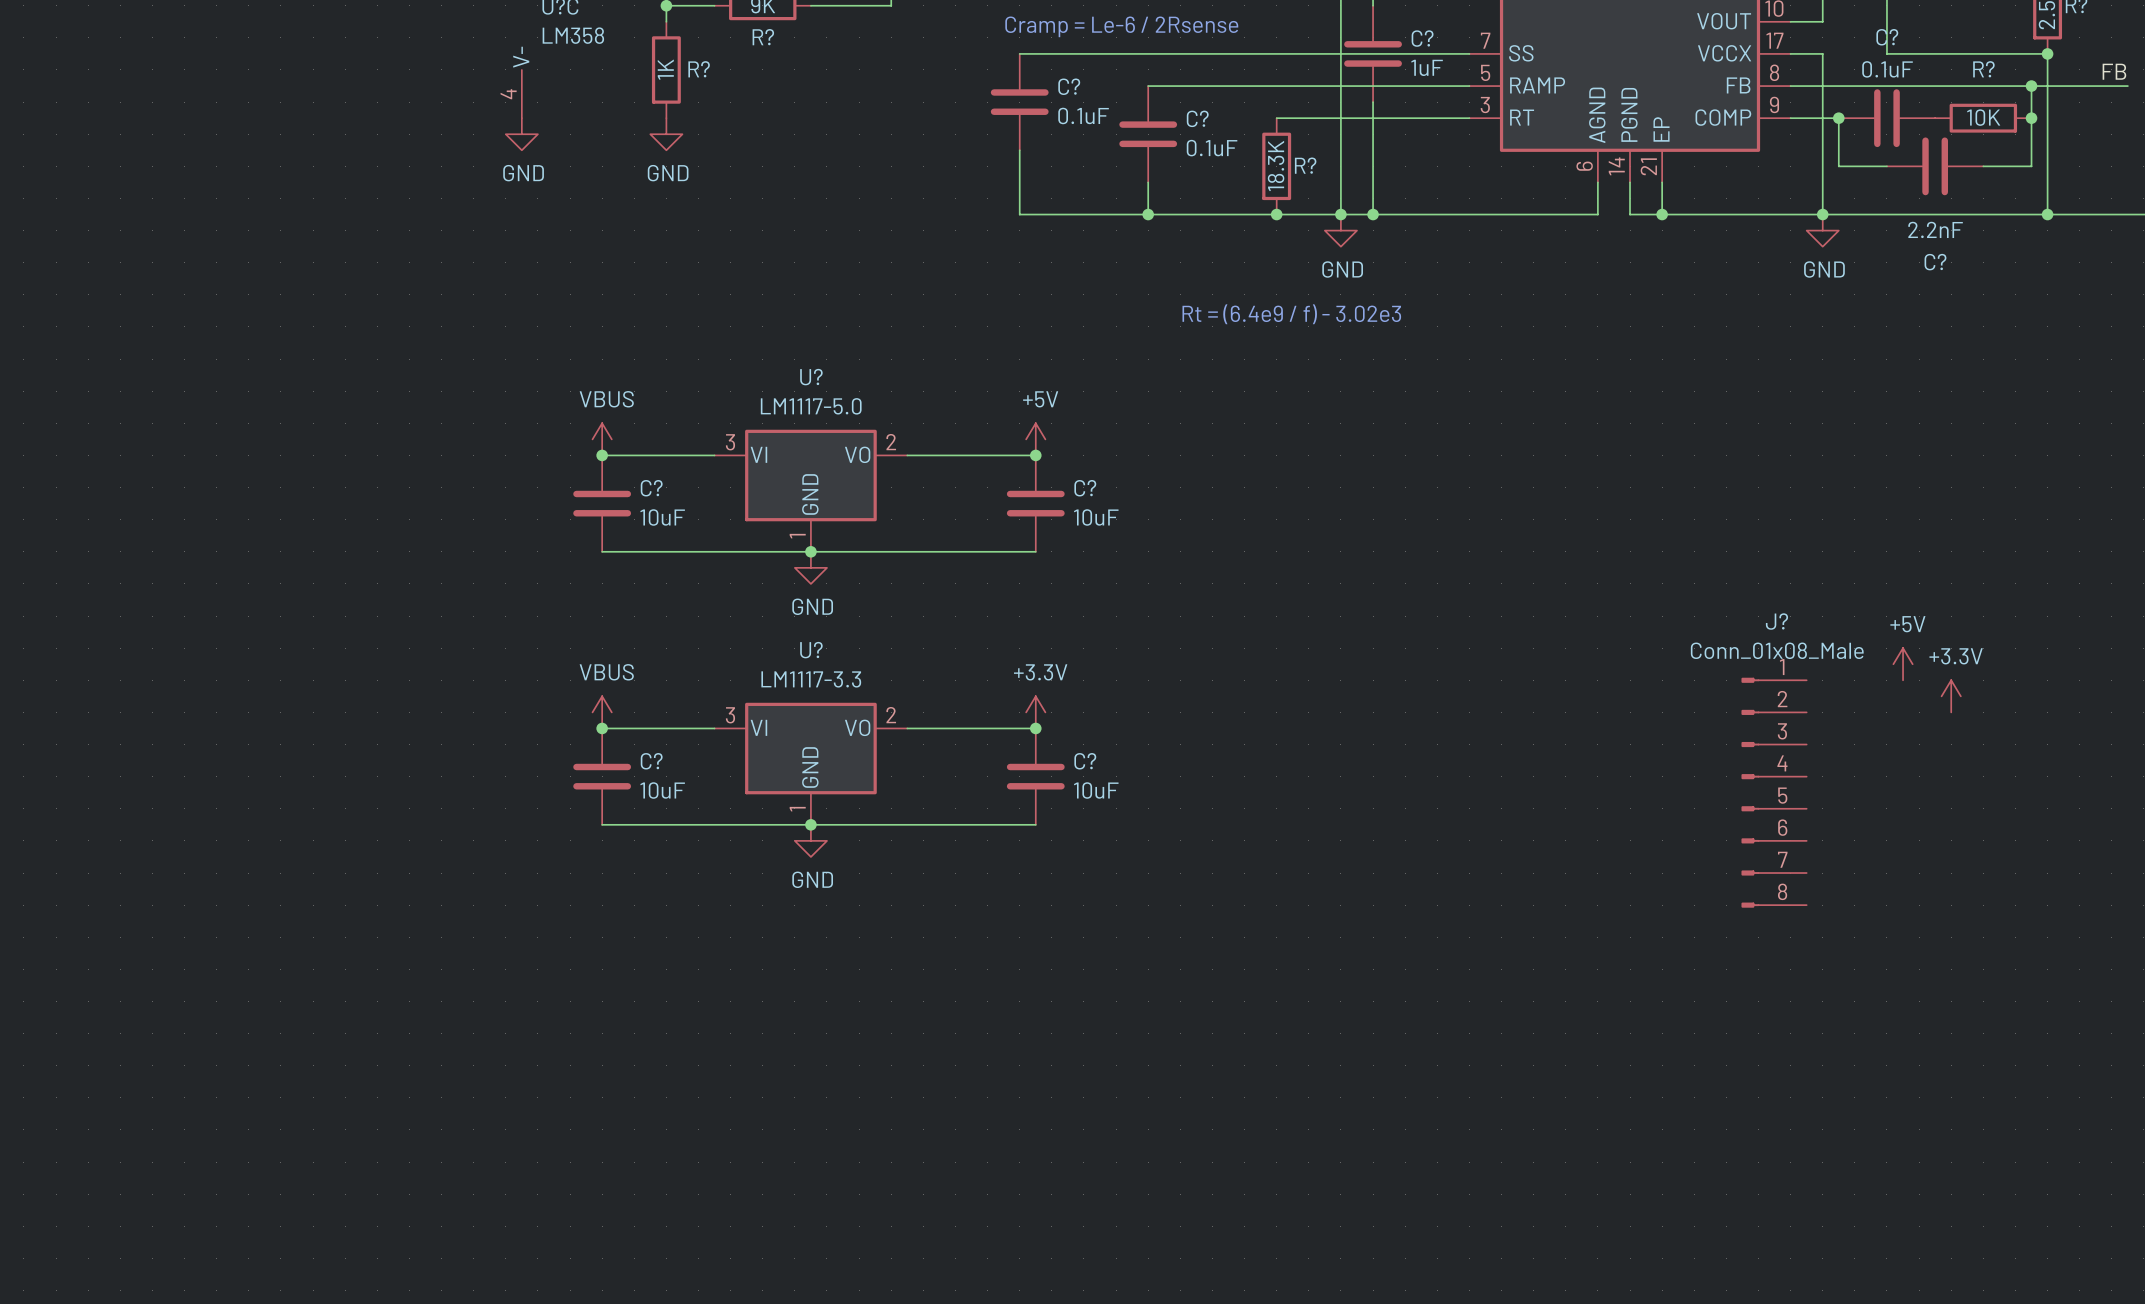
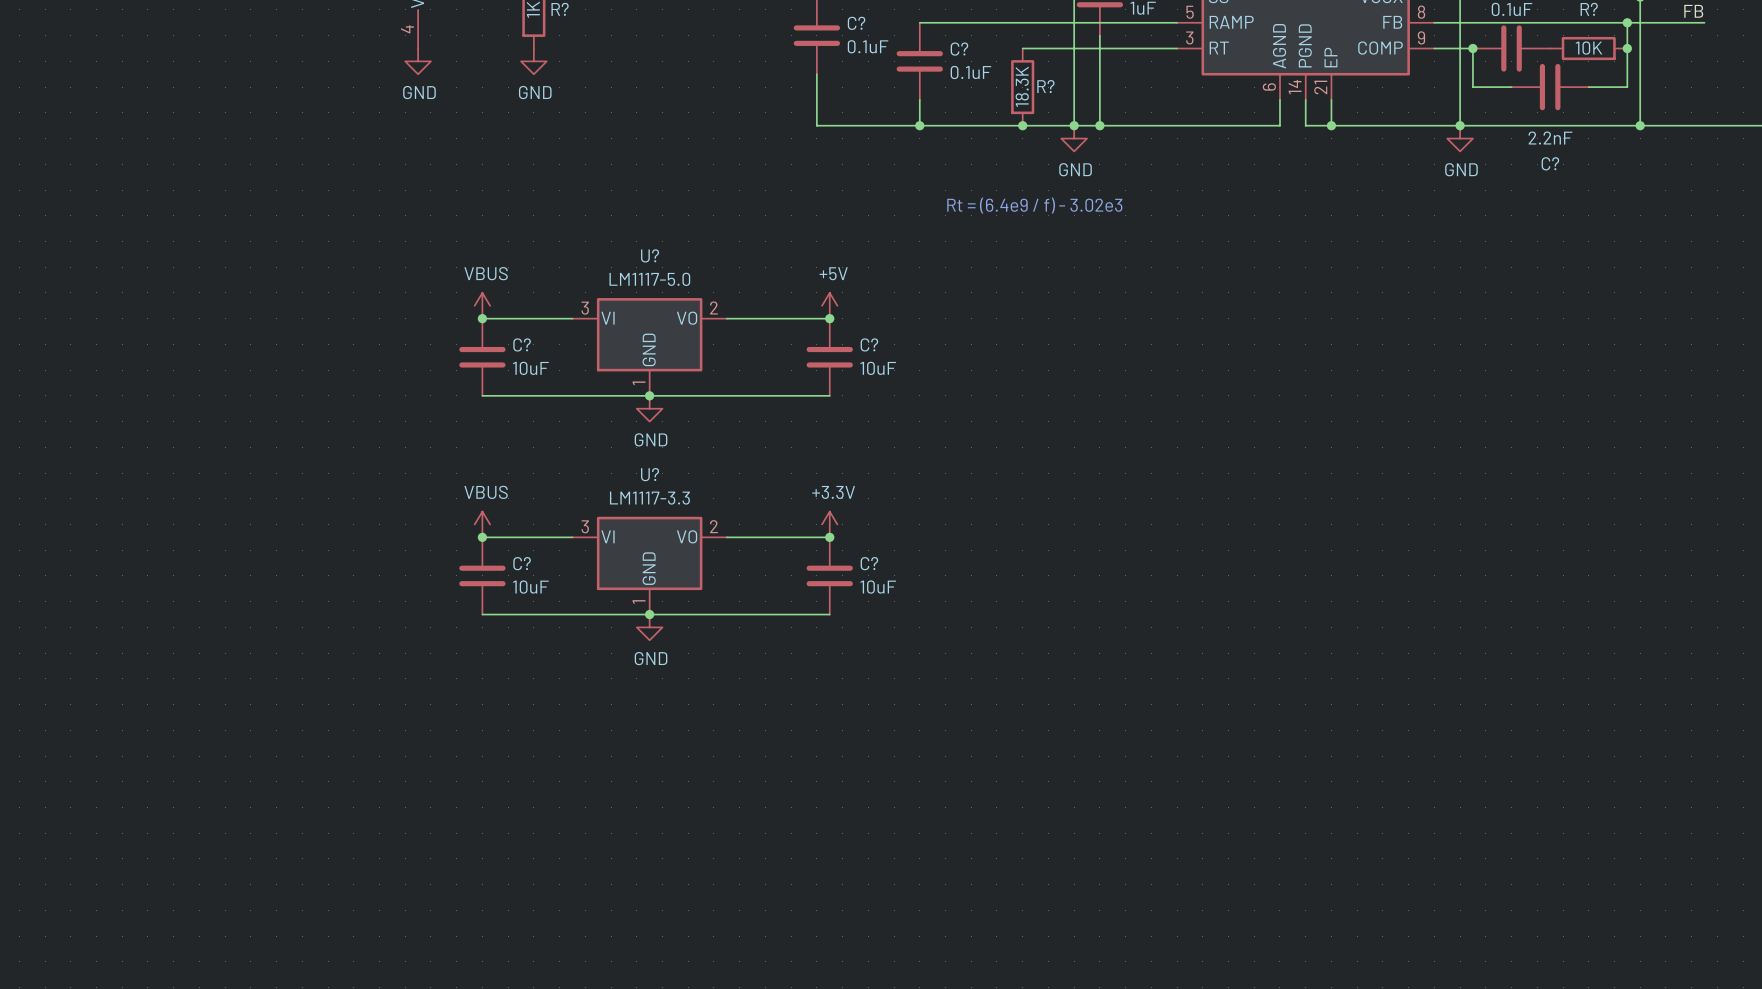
power symbol: +5V (1903, 664) -> none
power symbol: +3.3V (1951, 696) -> none
J?: Conn_01x08_Male (1774, 792) -> none

